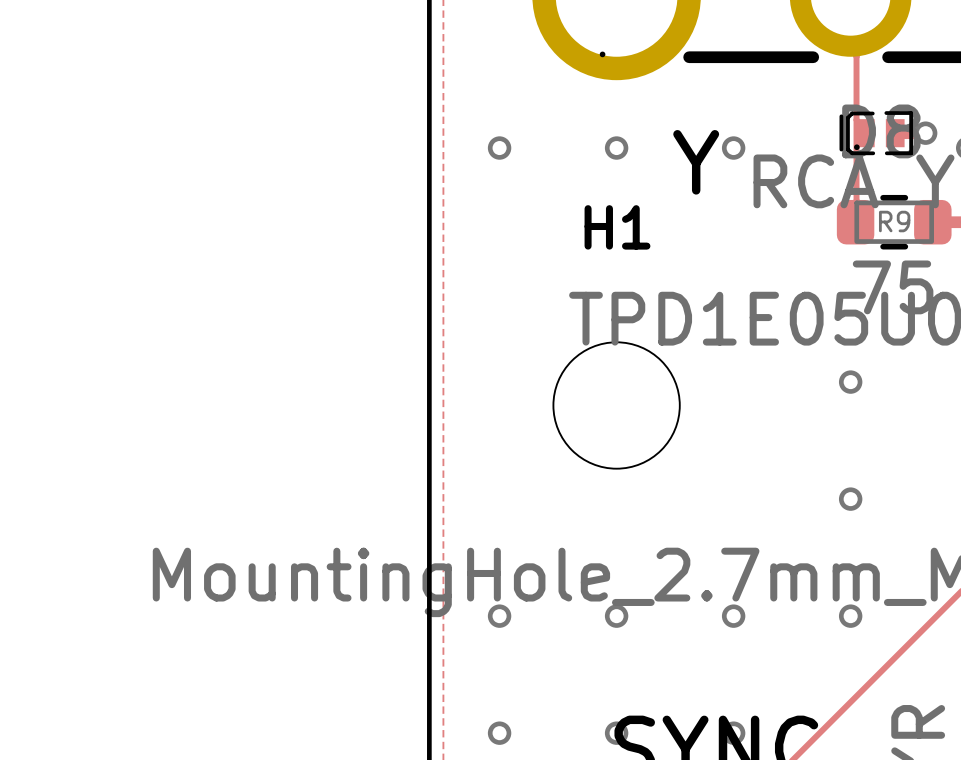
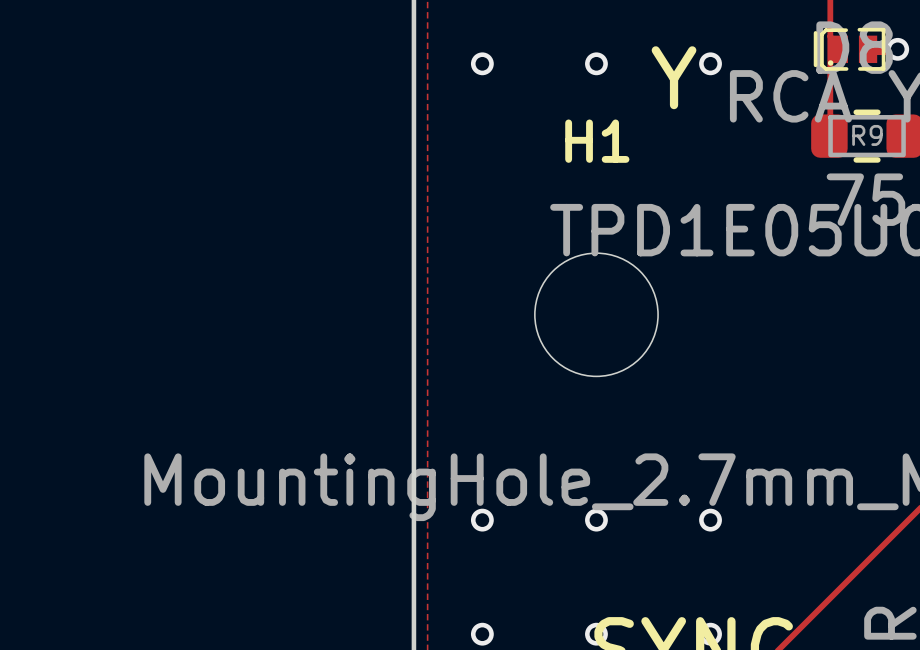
via: (850, 382) -> none
via: (850, 499) -> none
via: (850, 616) -> none

